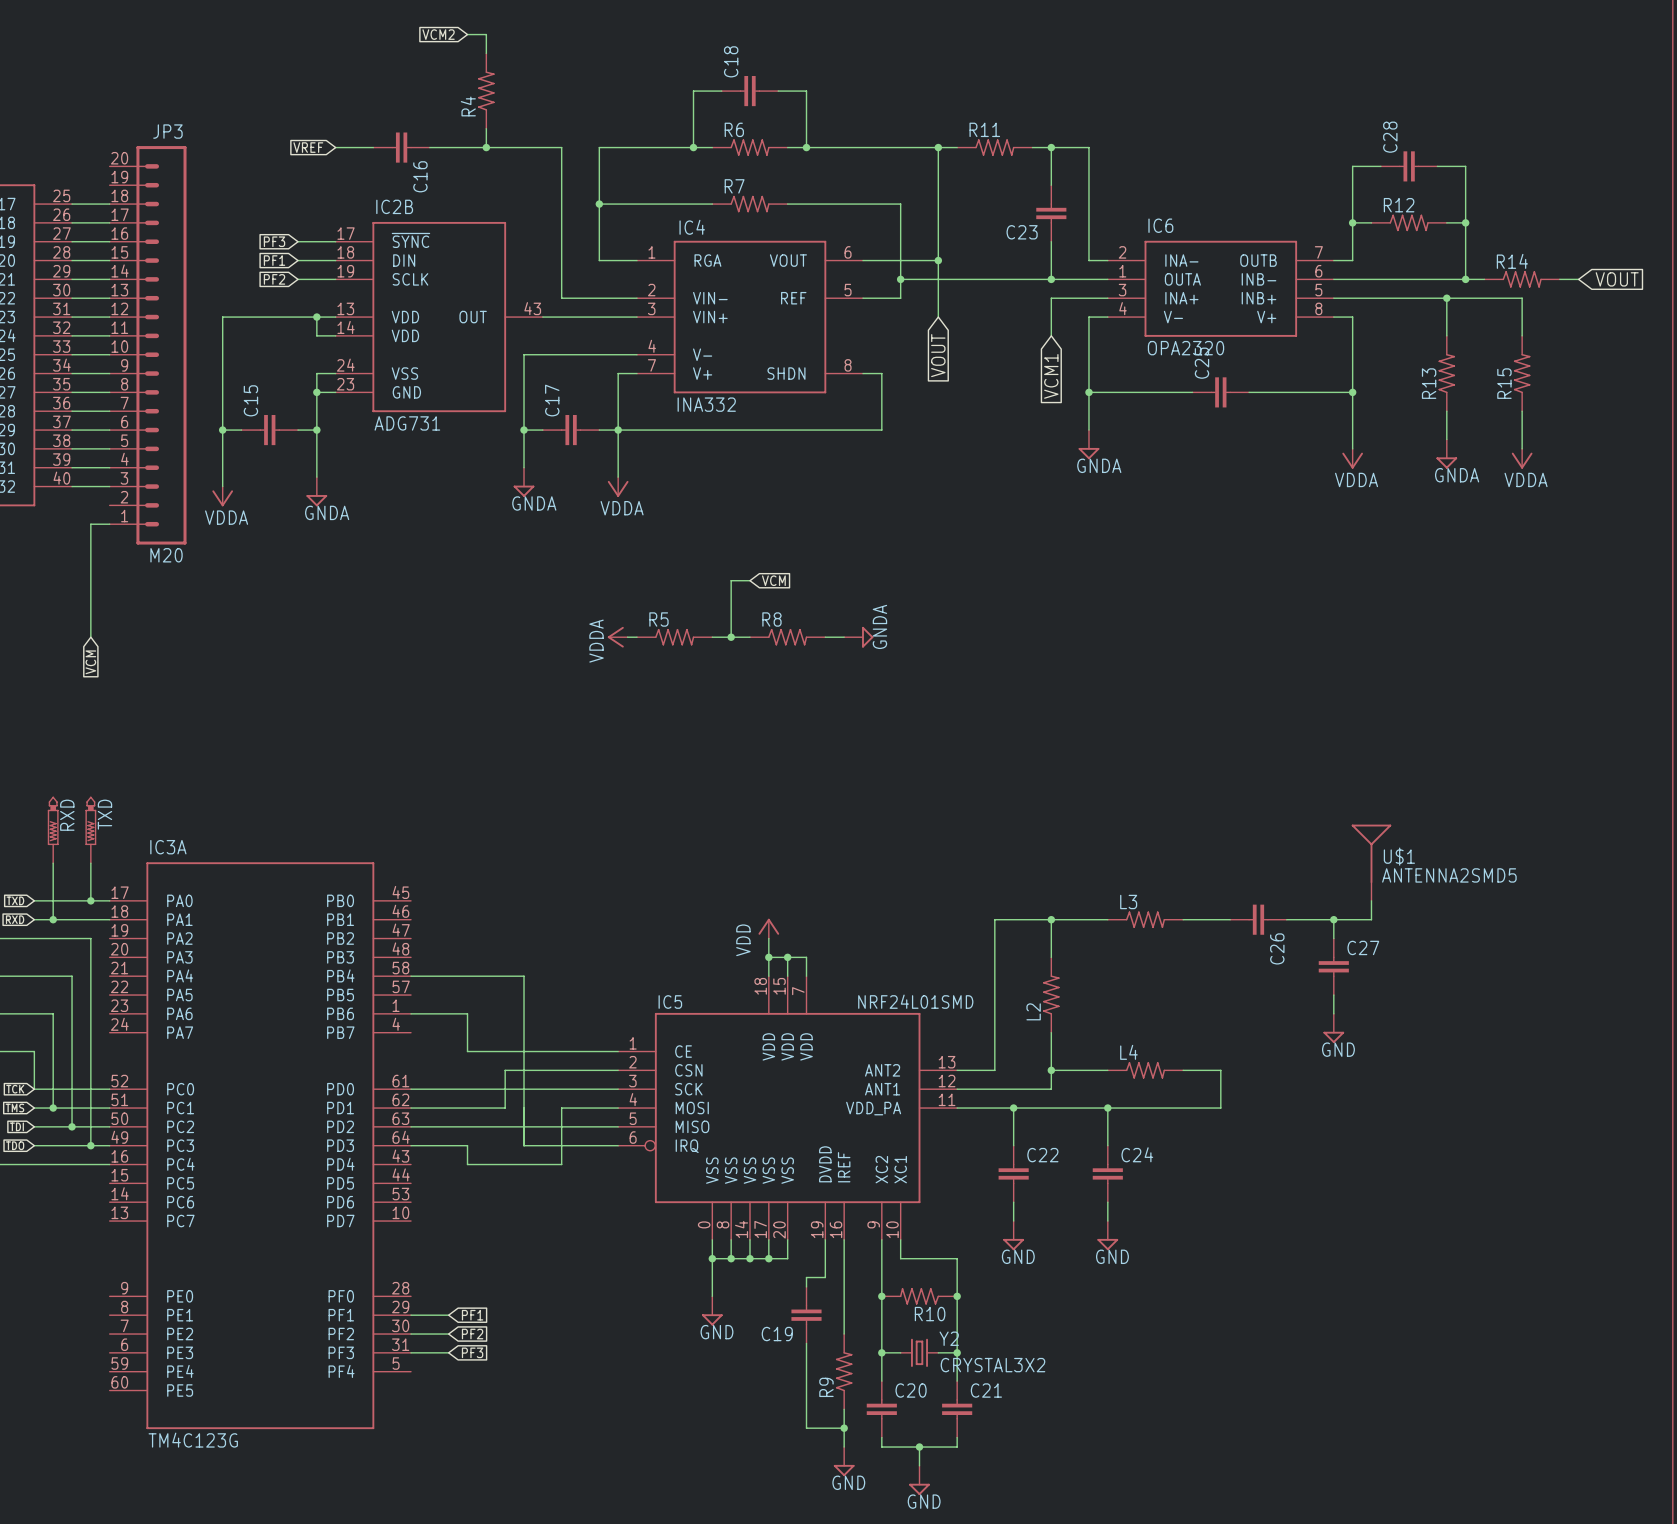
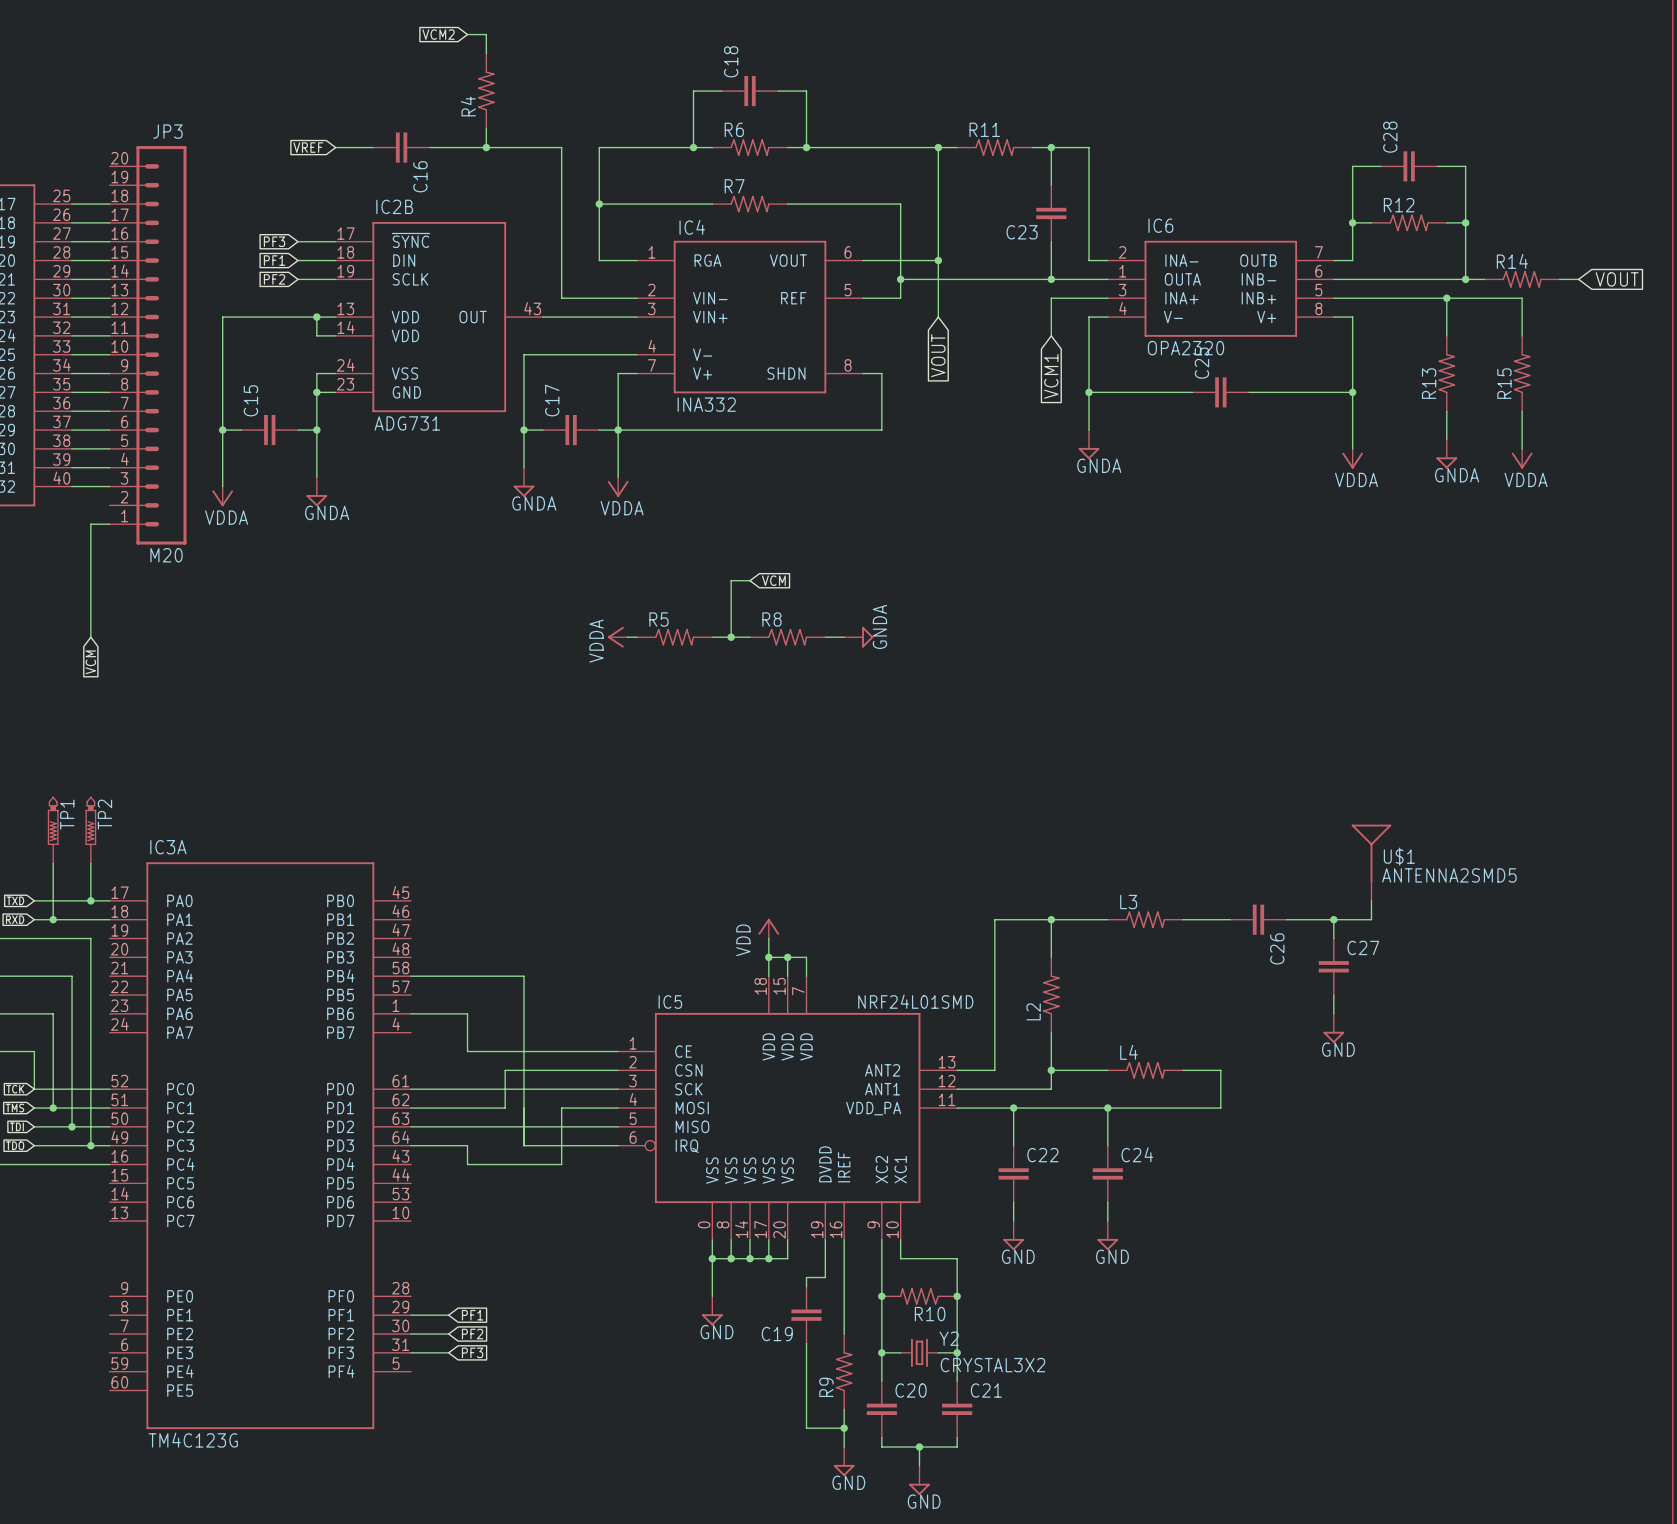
TXD name: TXD (104, 814) -> TP2 (104, 814)
RXD name: RXD (67, 815) -> TP1 (67, 814)

